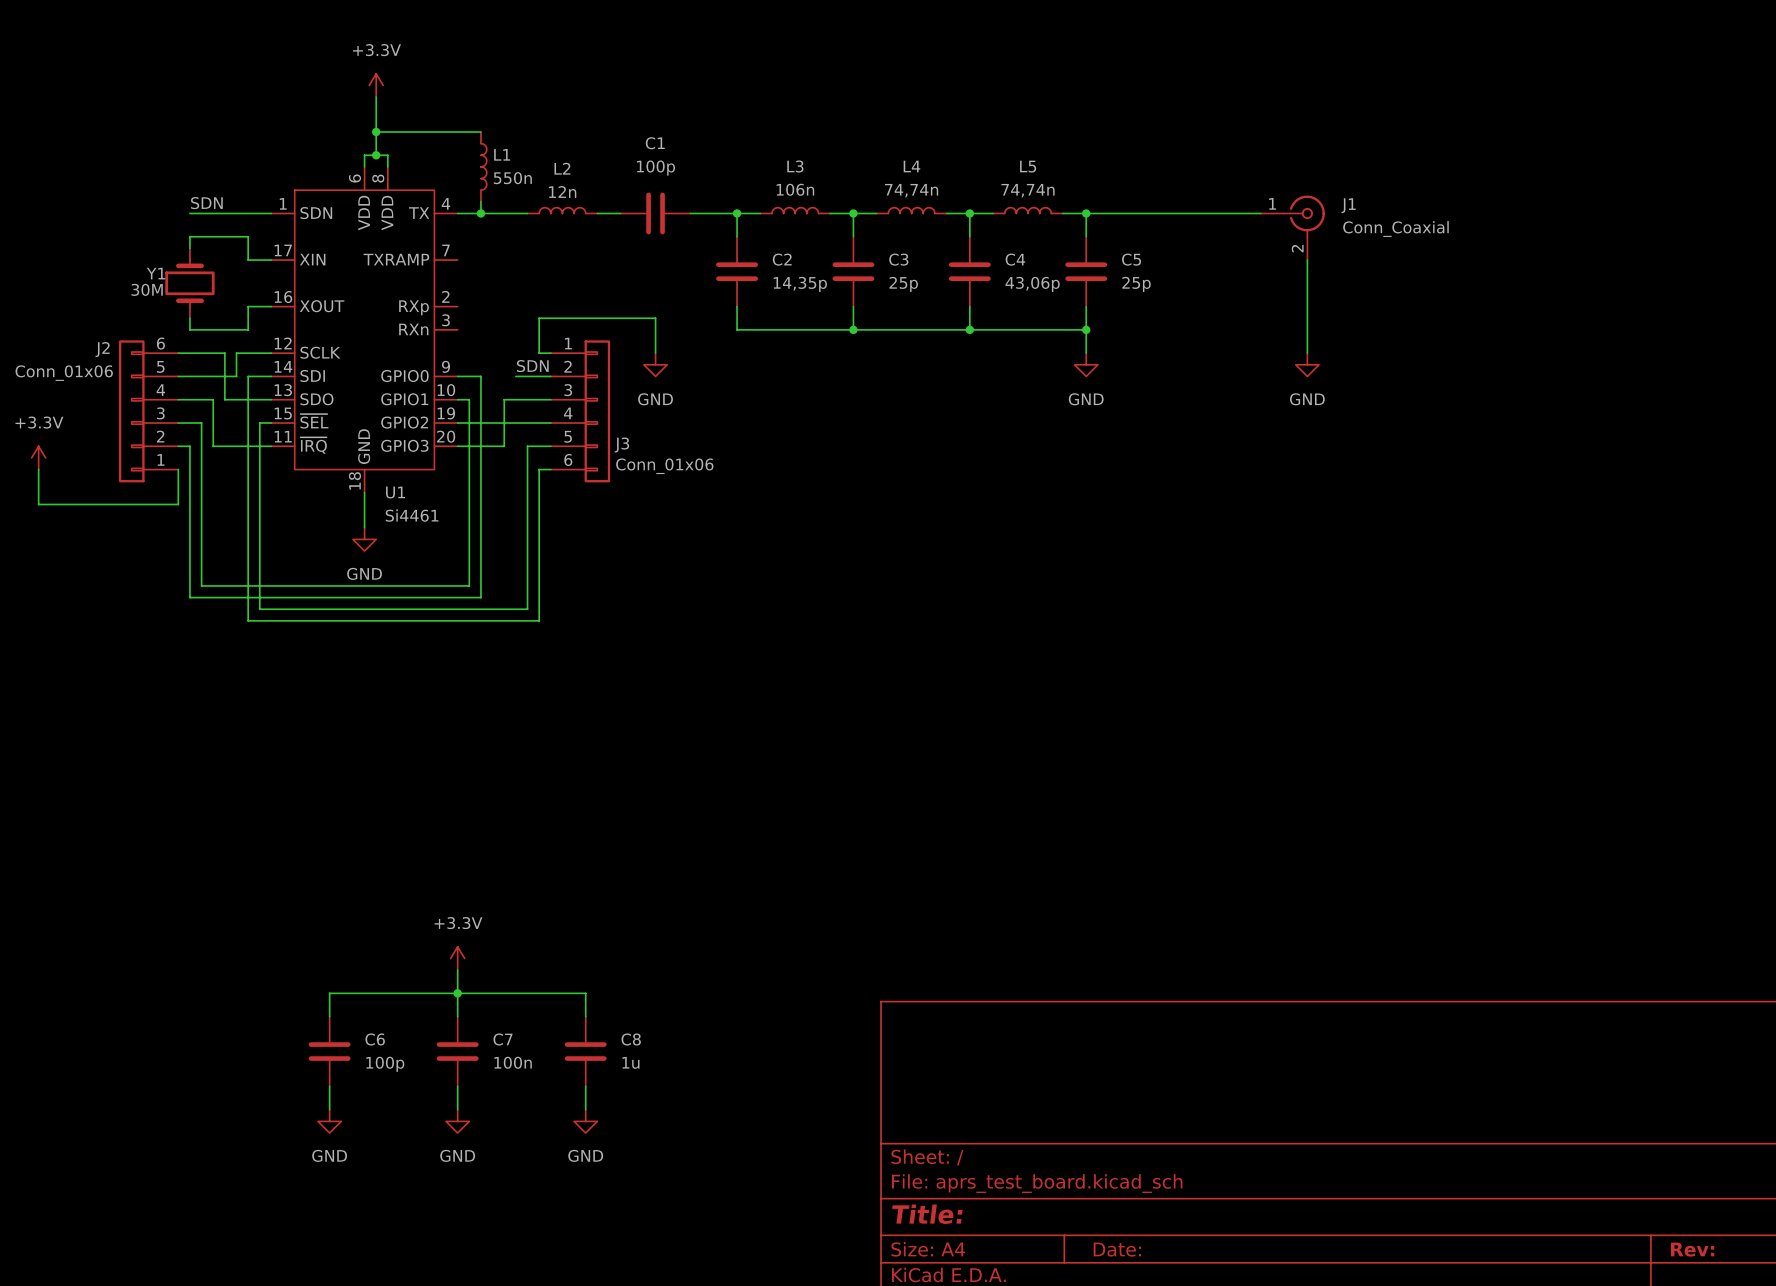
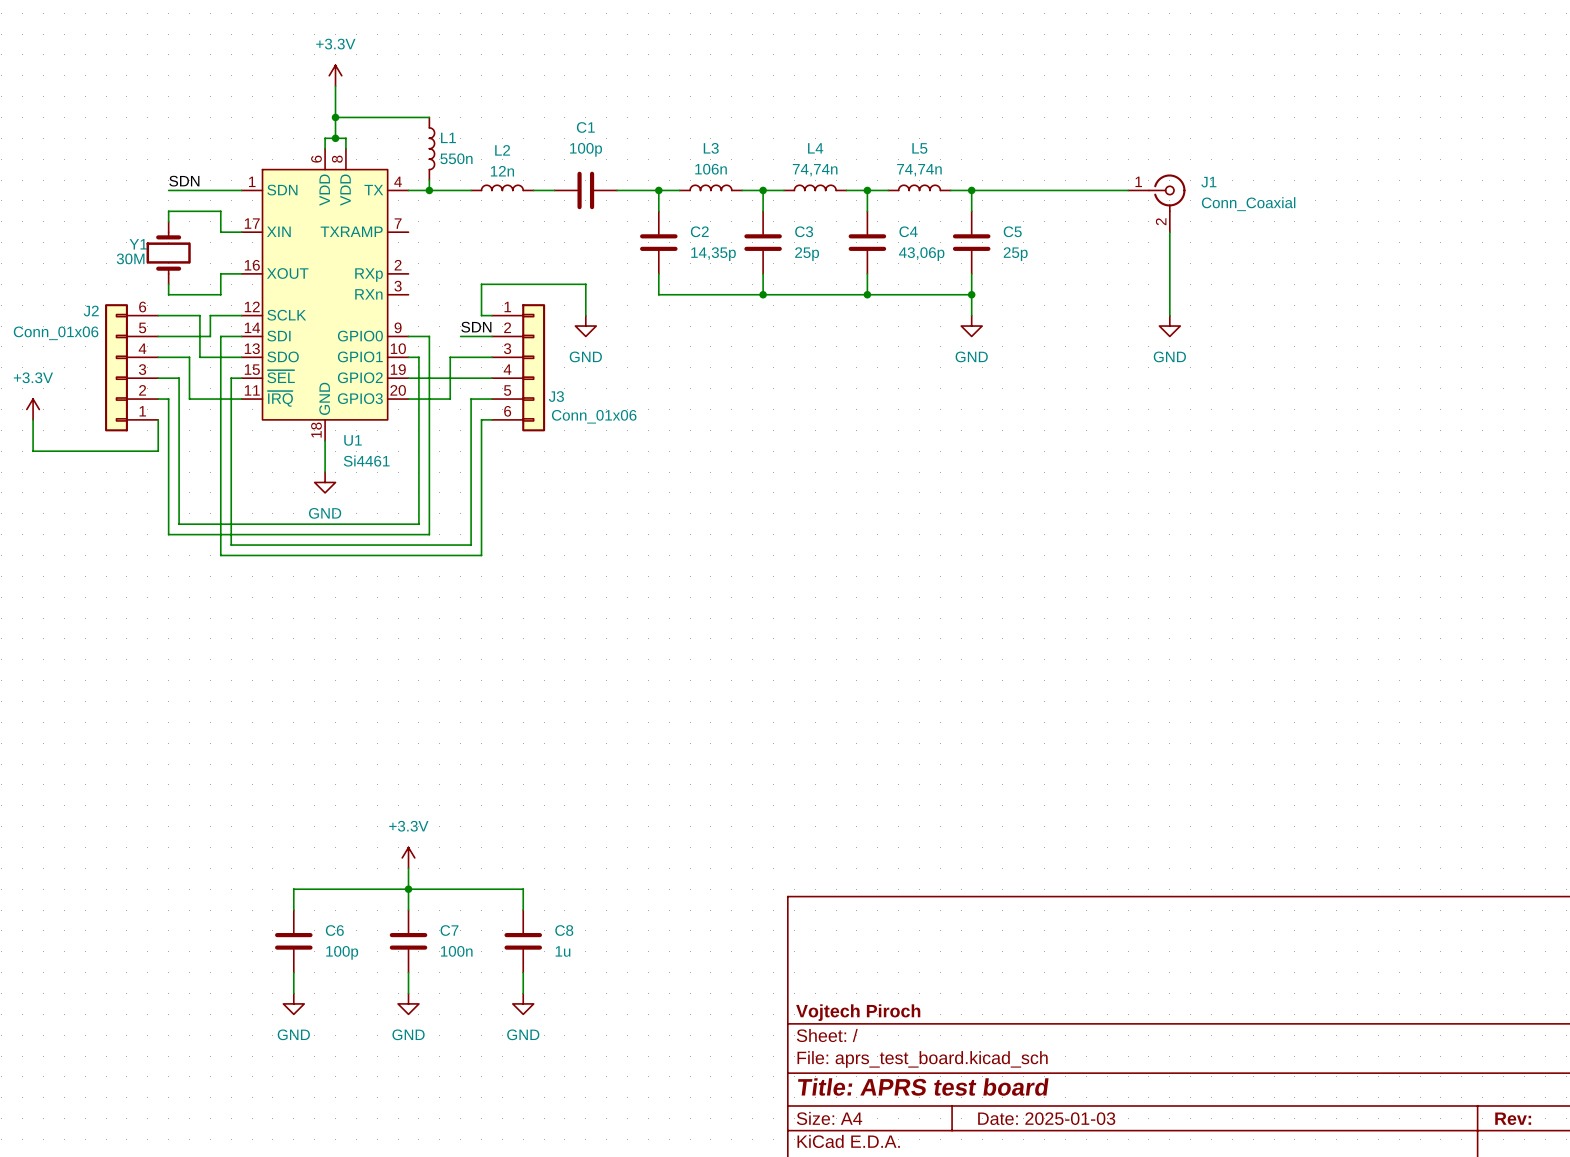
title block: none -> Vojtech Piroch (858, 1012)
title block: Title: (927, 1214) -> Title: APRS test board (923, 1086)
title block: Date: (1117, 1249) -> Date: 2025-01-03 (1046, 1118)

